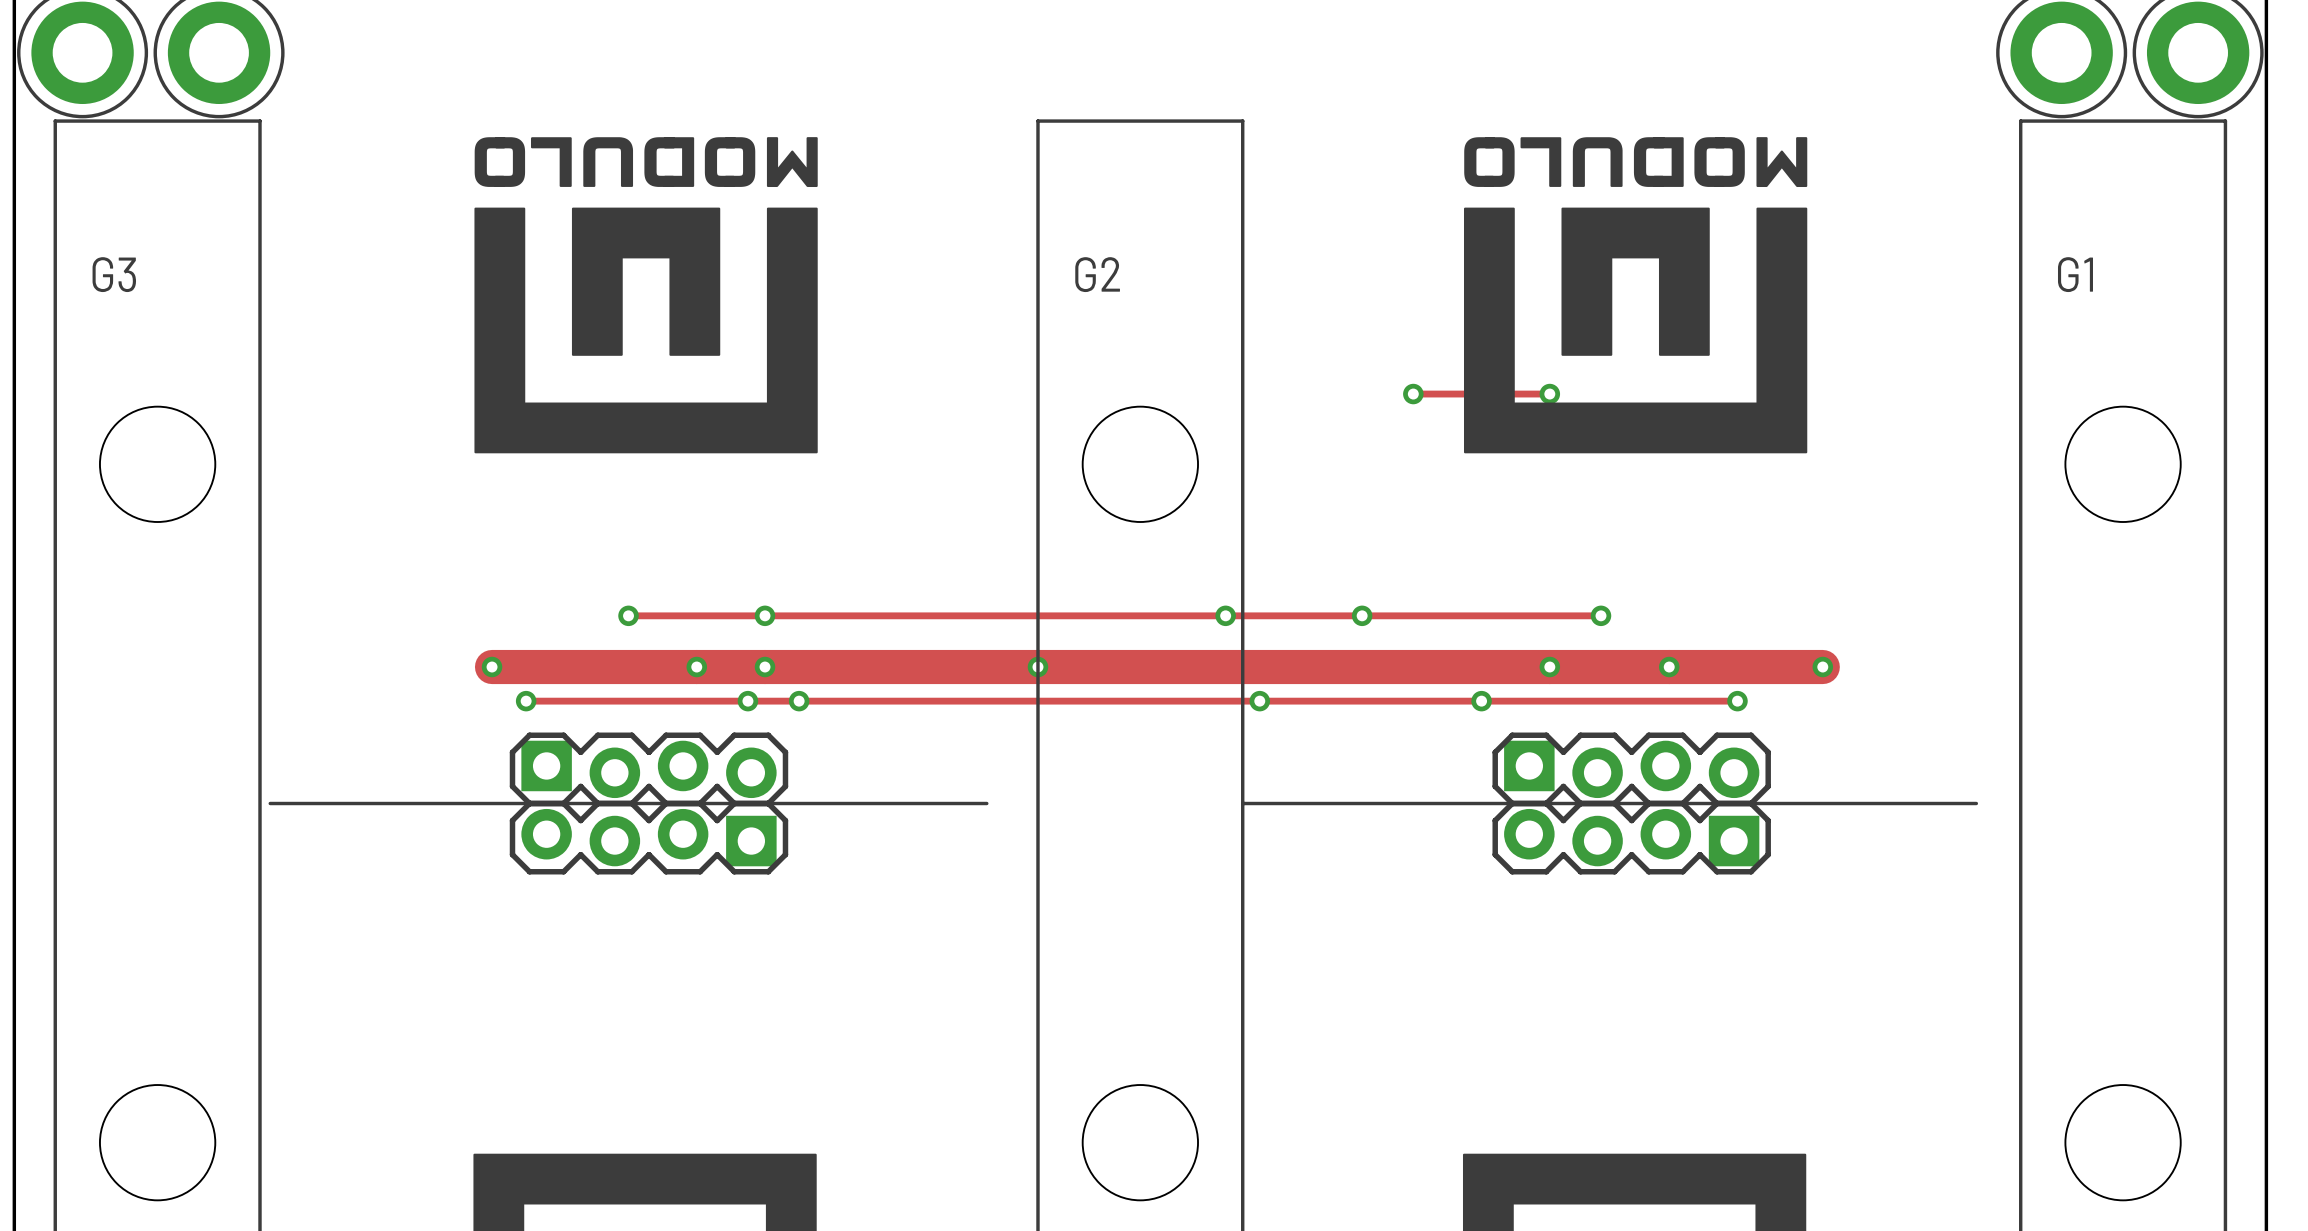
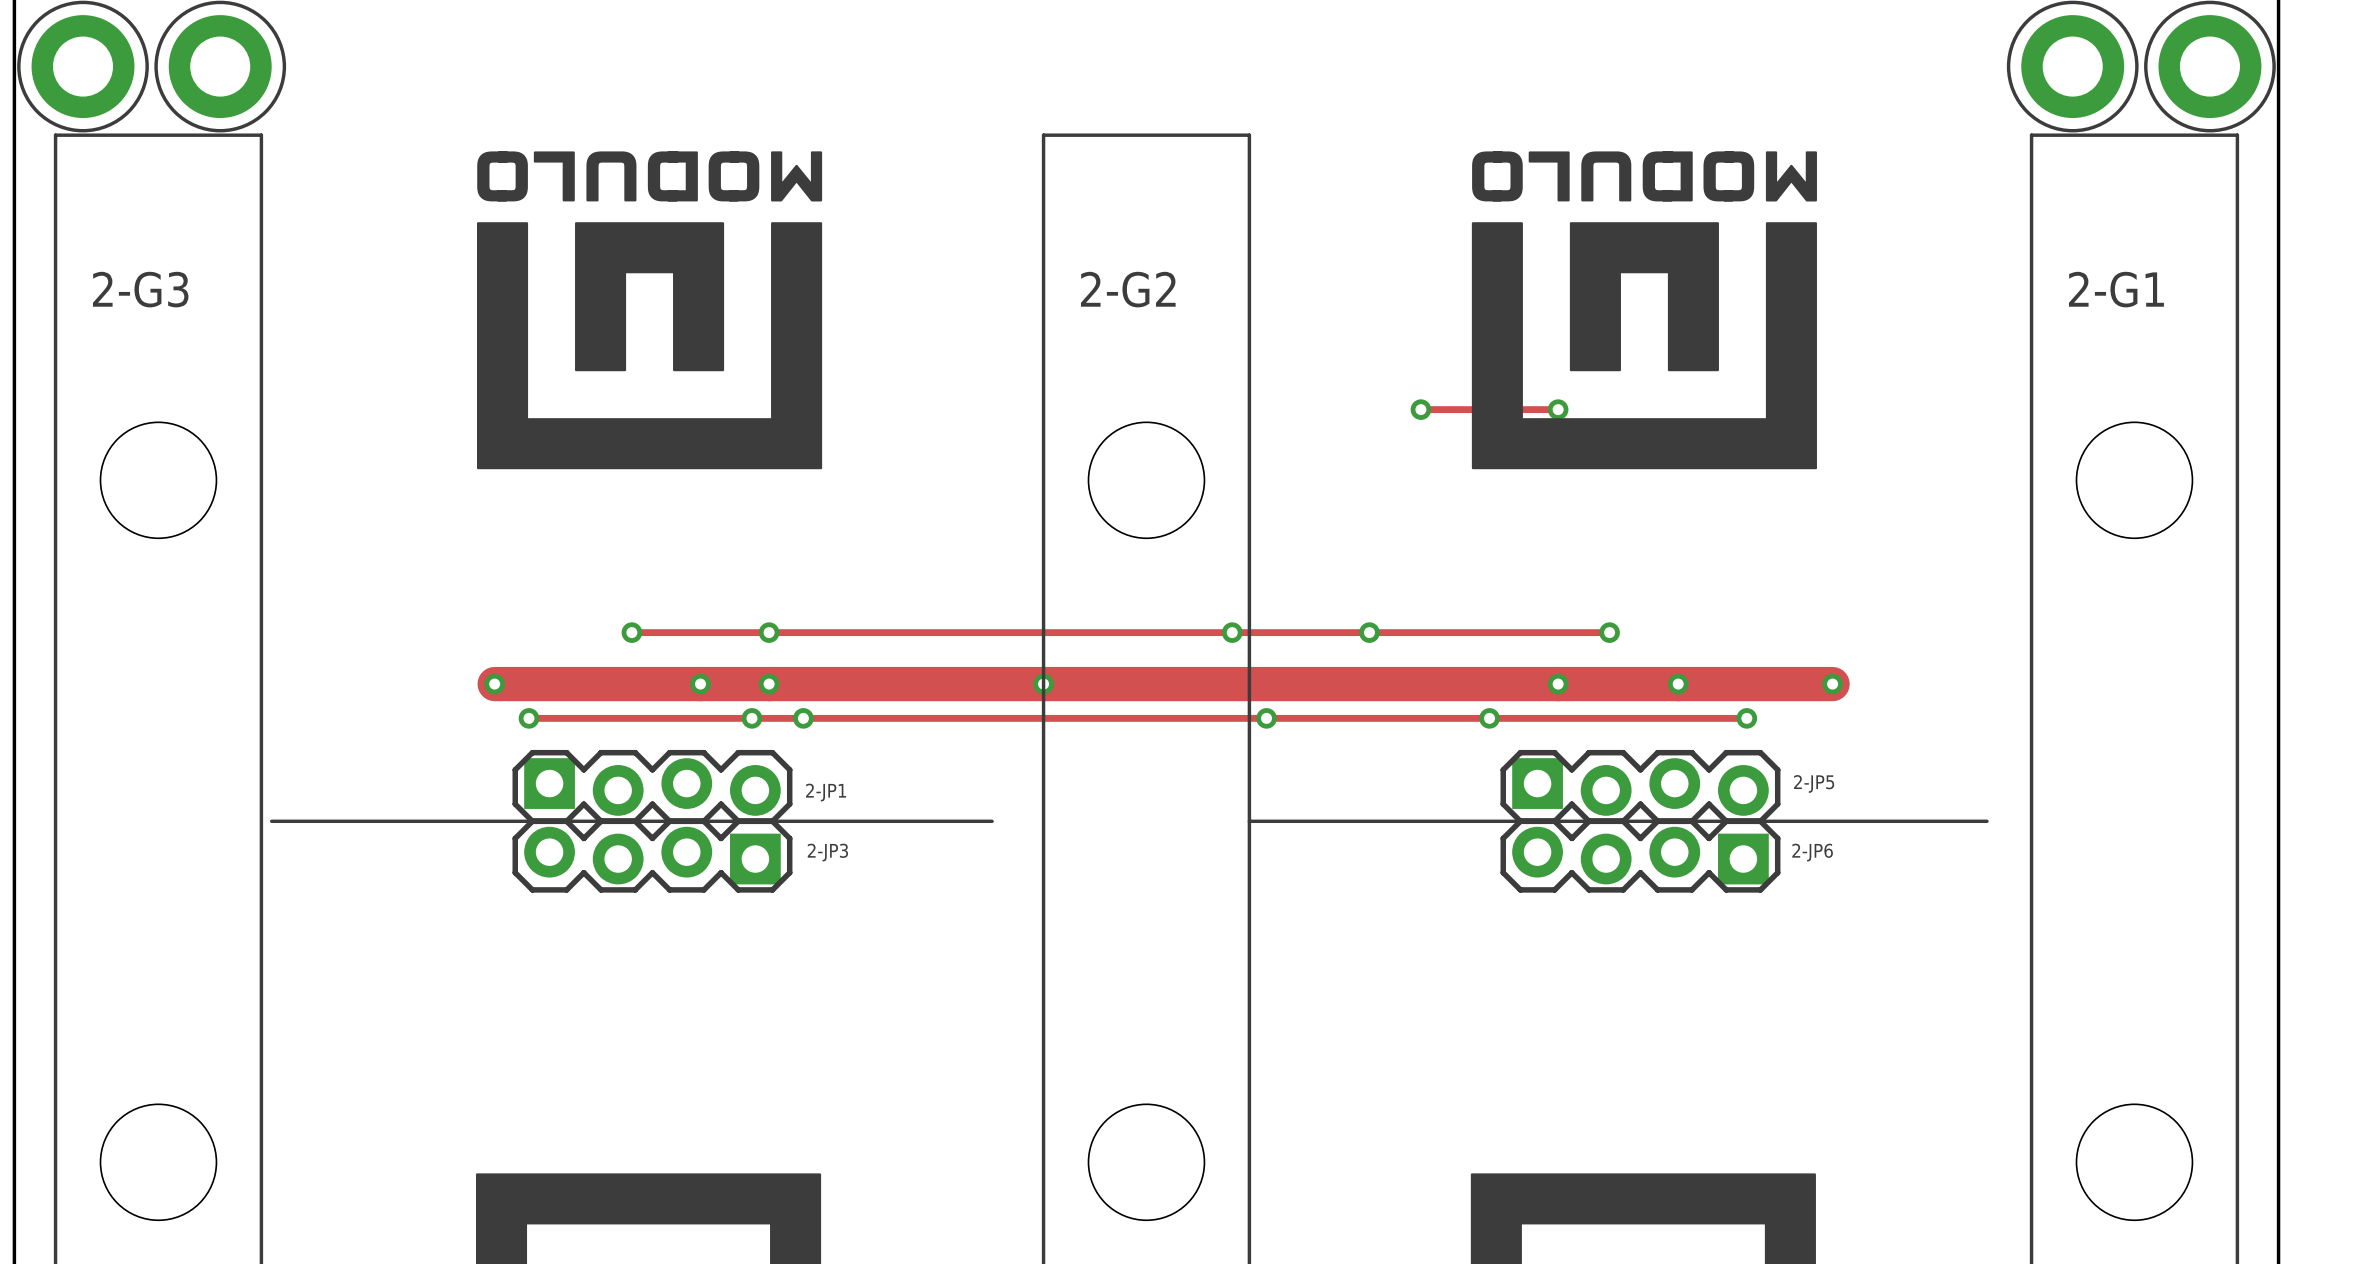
G3 name: G3 (114, 274) -> 2-G3 (140, 289)
G2 name: G2 (1097, 274) -> 2-G2 (1128, 289)
G1 name: G1 (2075, 274) -> 2-G1 (2116, 289)
2-JP5 name: none -> 2-JP5 (1814, 783)
2-JP1 name: none -> 2-JP1 (826, 792)
2-JP3 name: none -> 2-JP3 (827, 852)
2-JP6 name: none -> 2-JP6 (1812, 852)

